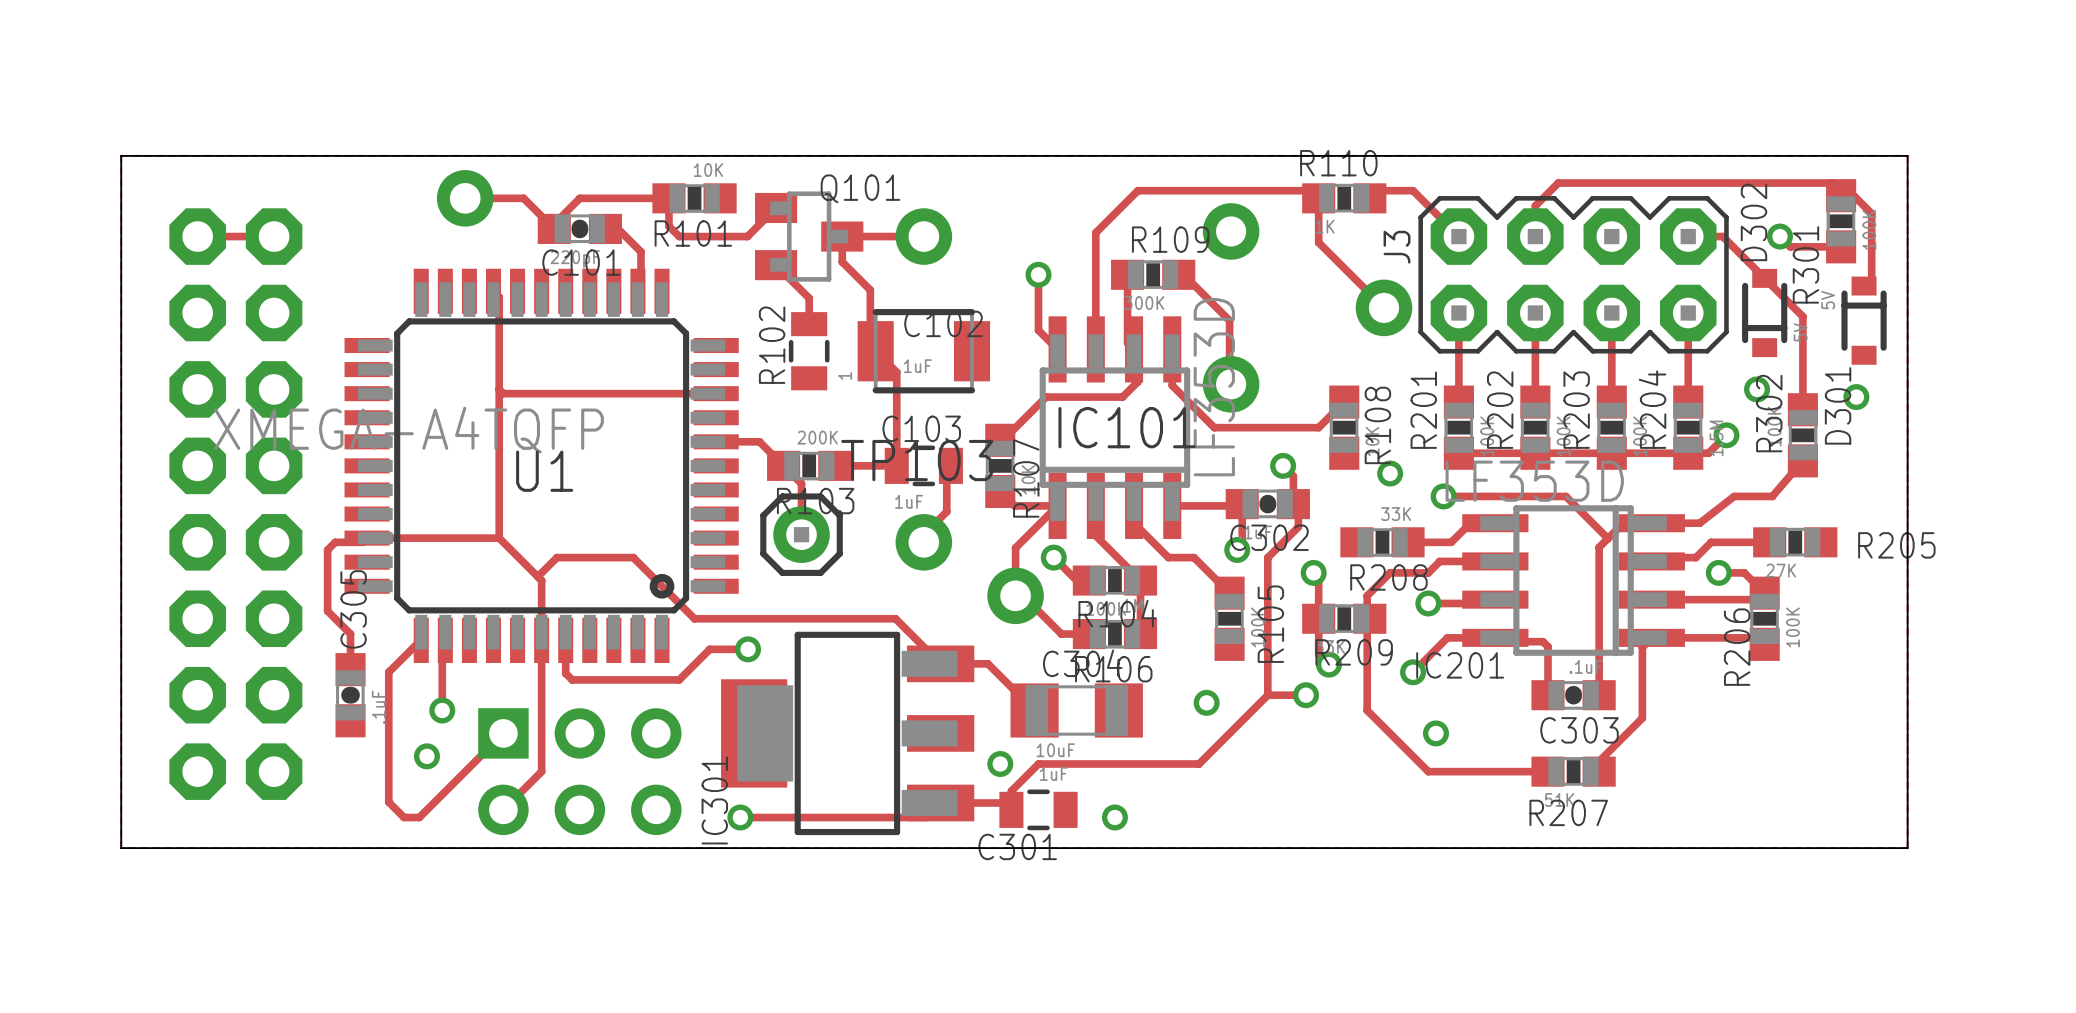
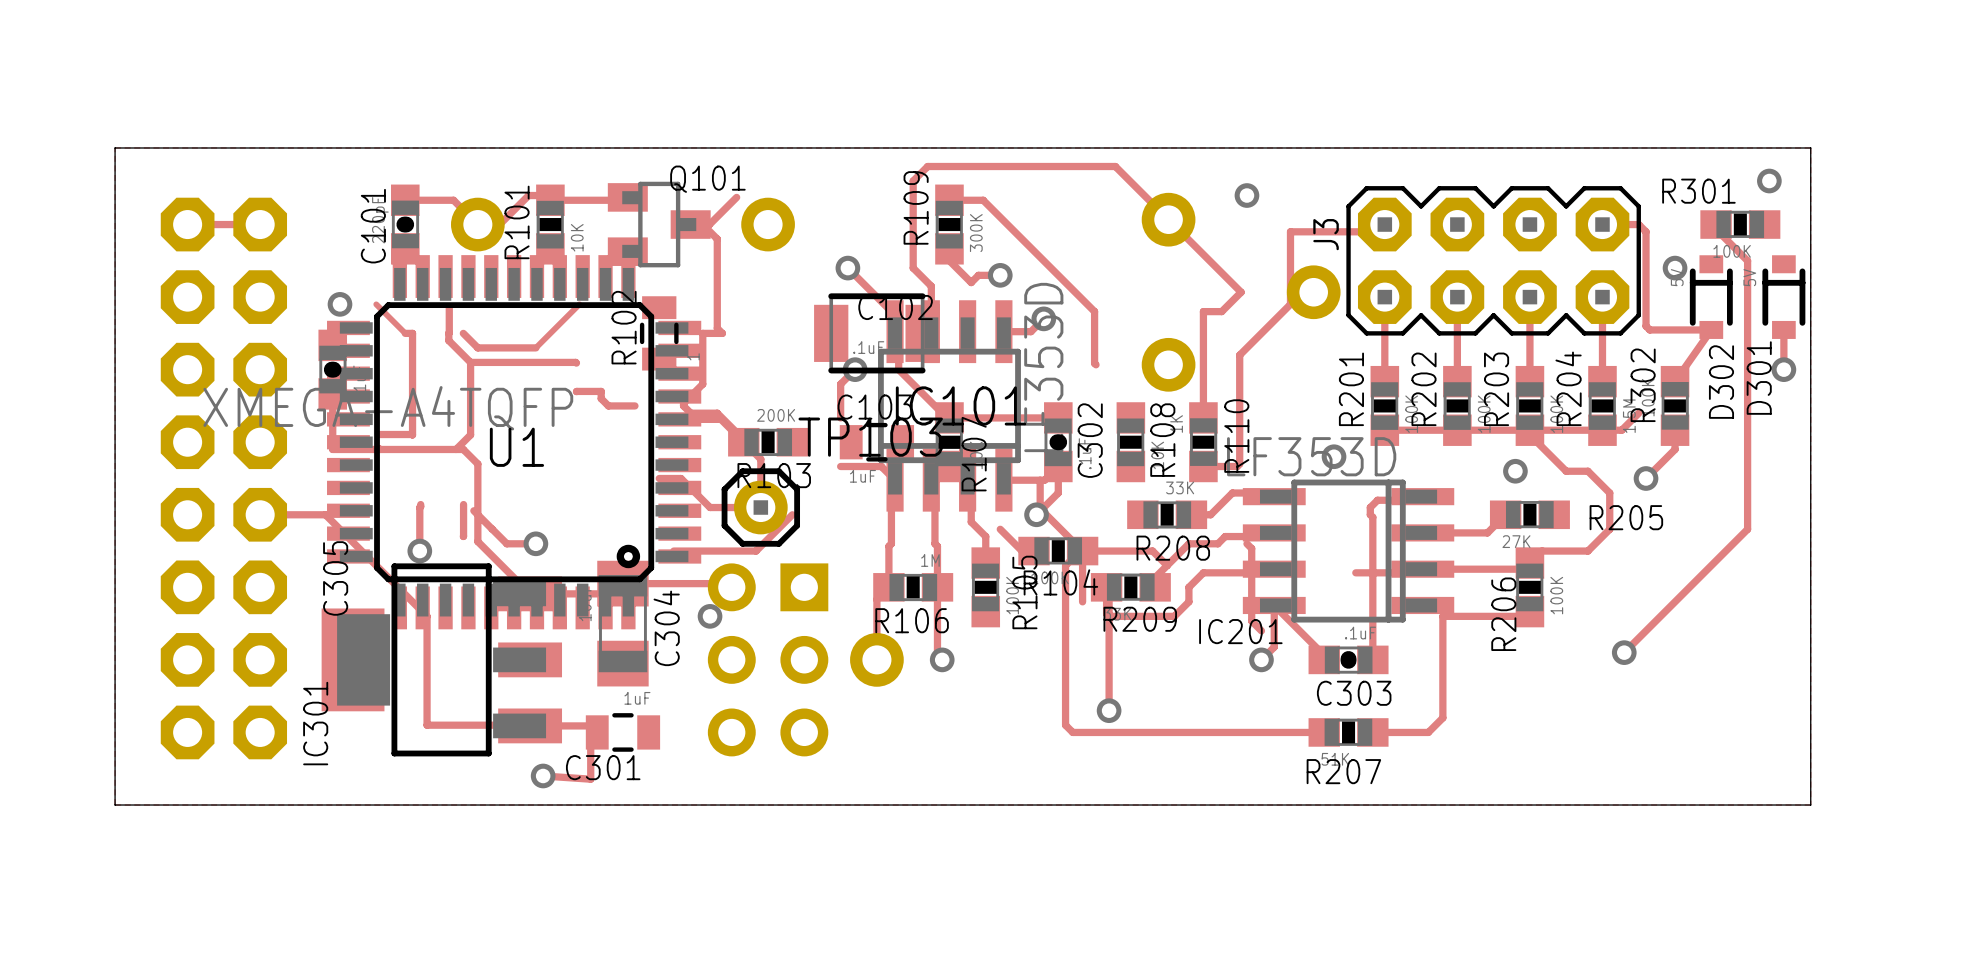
via: none -> (1769, 181)
track: (465, 198) (523, 198) (554, 228) (554, 223) (579, 198) (668, 198) (668, 226) (679, 236) (727, 236) -> none
part position: (465, 198) -> (477, 224)
R101 rotation: 0° (694, 198) -> 90° clockwise (550, 224)
R101 position: (694, 198) -> (550, 224)
R110 rotation: 0° (1344, 198) -> 90° clockwise (1203, 442)
R110 position: (1344, 198) -> (1203, 442)
track: (1369, 198) (1377, 190) (1413, 190) (1458, 236) -> (1203, 466) (1237, 466) (1239, 463) (1239, 355) (1290, 304) (1290, 231) (1377, 231) (1384, 224)
via: none -> (1246, 195)
track: none -> (627, 197) (624, 200) (550, 200) (545, 195) (528, 195) (499, 224) (477, 224) (453, 200) (405, 200)
track: none -> (949, 200) (983, 200) (1094, 311) (1096, 364)
R301 rotation: 0° (1841, 221) -> 90° clockwise (1740, 224)
C101 rotation: 0° (579, 228) -> 90° clockwise (405, 224)
C101 position: (579, 228) -> (405, 224)
track: (605, 228) (618, 228) (641, 251) (641, 288) (637, 291) -> none
track: none -> (702, 224) (717, 239) (717, 328) (722, 333) (702, 333) (702, 384) (683, 403) (683, 405) (690, 413) (717, 413) (742, 438) (742, 442)
Q101 position: (809, 236) -> (659, 224)
track: (923, 236) (842, 236) (842, 262) (870, 290) (870, 345) (896, 372) (896, 465) (834, 465) -> none
part position: (923, 236) -> (768, 224)
track: (1535, 236) (1535, 205) (1558, 183) (1833, 183) (1841, 195) (1853, 195) (1871, 213) (1871, 278) (1864, 286) -> none
track: (1722, 236) (1802, 316) (1802, 409) -> (1635, 224) (1638, 224) (1646, 231) (1646, 326) (1649, 329) (1711, 329) (1675, 381)
track: (1779, 236) (1790, 246) (1841, 246) -> none
via: (1779, 236) -> none
track: none -> (1716, 224) (1716, 229) (1747, 260) (1747, 529) (1624, 652)
track: none -> (949, 248) (949, 260) (971, 282) (978, 275) (1000, 275)
track: (776, 265) (809, 298) (809, 324) -> none
track: (1038, 274) (1038, 330) (1057, 349) -> (1043, 318) (1031, 331) (1003, 331)
via position: (1038, 274) -> (1000, 275)
track: (1127, 274) (1127, 342) (1137, 353) (1137, 381) (1122, 397) (1046, 397) (1002, 440) -> (1058, 417) (951, 417)
R109 rotation: 0° (1153, 274) -> 90° clockwise (949, 224)
R109 position: (1153, 274) -> (949, 224)
track: (1178, 274) (1183, 274) (1229, 320) (1231, 384) -> none
track: none -> (847, 268) (891, 311) (891, 333) (895, 331) (898, 335) (898, 369) (946, 417) (949, 417)
via: none -> (847, 268)
via: none -> (1675, 268)
track: (493, 291) (499, 297) (499, 538) (367, 538) (362, 542) (342, 542) -> (590, 725) (427, 725) (427, 616) (325, 514)
track: (1383, 307) (1318, 242) (1318, 198) (1311, 190) (1137, 190) (1095, 232) (1095, 349) -> none
D302 rotation: 0° (1764, 313) -> 180° (1711, 297)
via: none -> (339, 304)
track: none -> (376, 304) (405, 333) (412, 333) (412, 434) (379, 434)
track: none -> (579, 304) (535, 347) (477, 347) (463, 333)
D301 position: (1864, 320) -> (1783, 297)
track: none -> (449, 307) (448, 340) (470, 362)
via: none -> (1043, 318)
track: none -> (931, 331) (931, 286) (913, 268) (913, 181) (927, 166) (1115, 166) (1241, 292) (1221, 311) (1203, 311) (1203, 417)
track: (1172, 349) (1172, 385) (1214, 427) (1318, 427) (1344, 402) -> none
R102 position: (809, 351) -> (659, 333)
track: none -> (1783, 333) (1783, 369)
track: none -> (470, 362) (576, 363)
track: none -> (470, 362) (470, 434) (456, 449)
track: (499, 389) (503, 393) (716, 393) -> none
track: none -> (855, 369) (840, 384) (840, 417)
via: none -> (855, 369)
via: (1757, 389) -> none
via position: (1856, 397) -> (1783, 369)
track: none -> (576, 391) (601, 391) (601, 398) (608, 405) (634, 405)
track: none -> (332, 393) (332, 449) (463, 449) (477, 463) (477, 541) (530, 593) (612, 593) (622, 583) (728, 583) (731, 587)
IC101 position: (1114, 427) -> (949, 405)
R108 position: (1344, 427) -> (1130, 442)
via: (1726, 435) -> none
R302 position: (1802, 435) -> (1675, 405)
track: none -> (1529, 430) (1529, 434) (1566, 471) (1587, 471) (1609, 493) (1609, 529) (1587, 551) (1541, 551) (1523, 569) (1422, 569)
track: none -> (1675, 430) (1675, 449) (1646, 478)
track: (1802, 460) (1772, 496) (1734, 496) (1699, 523) (1651, 523) (1648, 527) (1619, 527) (1599, 547) (1599, 695) -> none
track: (950, 465) (946, 470) (946, 511) (923, 534) (923, 542) -> none
track: (1283, 465) (1293, 476) (1293, 504) (1298, 509) (1298, 527) (1267, 557) (1267, 695) -> none
via: (1283, 465) -> none
via position: (1390, 473) -> (1334, 456)
track: none -> (840, 466) (881, 466) (895, 480) (891, 483) (888, 587) (876, 599) (876, 659)
track: (1000, 491) (1014, 505) (1057, 505) (1015, 547) (1015, 595) (1023, 595) (1061, 634) (1089, 634) -> none
track: (1443, 496) (1565, 496) (1607, 538) -> none
via: (1443, 496) -> none
via: none -> (1515, 471)
track: none -> (659, 478) (681, 478) (710, 507) (736, 507) (743, 514)
C302 rotation: 0° (1267, 504) -> 90° clockwise (1058, 442)
C302 position: (1267, 504) -> (1058, 442)
via: none -> (1646, 478)
track: none -> (931, 480) (934, 483) (934, 543) (937, 546) (937, 655) (942, 659)
track: none -> (967, 480) (971, 483) (971, 522) (985, 536) (985, 563)
track: none -> (1003, 480) (1044, 480) (1058, 466) (1058, 493) (1036, 514)
track: (1134, 505) (1134, 523) (1168, 557) (1194, 557) (1229, 593) -> none
track: (1172, 505) (1240, 505) (1242, 504) (1242, 544) (1237, 549) -> none
track: none -> (1274, 496) (1270, 493) (1232, 493) (1210, 514) (1191, 514)
track: (1466, 527) (1451, 542) (1408, 542) -> (1392, 500) (1377, 500) (1370, 507) (1370, 514) (1372, 517) (1372, 659)
track: none -> (420, 504) (419, 551)
track: none -> (463, 504) (463, 536)
track: (335, 542) (327, 549) (327, 611) (350, 634) (350, 669) -> (318, 514) (260, 514)
track: none -> (792, 514) (756, 551) (673, 551)
part: (923, 542) -> none
R208 position: (1382, 542) -> (1167, 514)
track: none -> (1505, 514) (1487, 532) (1422, 532)
track: (1769, 542) (1711, 542) (1695, 557) (1655, 557) (1651, 561) -> none
R205 position: (1795, 542) -> (1529, 514)
via: (1237, 549) -> none
via position: (1053, 557) -> (1036, 514)
track: none -> (1274, 532) (1270, 536) (1225, 536) (1217, 543) (1188, 543) (1155, 577) (1155, 587)
track: (1495, 561) (1439, 561) (1428, 572) (1390, 572) (1367, 595) (1367, 616) (1369, 618) (1367, 621) (1367, 710) (1428, 771) (1446, 771) -> none
track: (533, 572) (541, 580) (541, 771) (503, 809) -> (506, 543) (535, 543)
via: none -> (535, 543)
via: (1313, 572) -> none
track: (1718, 572) (1744, 572) (1764, 593) (1758, 599) (1651, 599) -> none
via: (1718, 572) -> none
track: (537, 576) (556, 557) (633, 557) (694, 618) (895, 618) (940, 663) (987, 663) (1034, 710) -> none
via: none -> (419, 551)
IC201 position: (1573, 580) -> (1348, 551)
part: (1015, 595) -> none
track: none -> (1167, 565) (1152, 551) (1080, 551) (1065, 565) (1065, 725) (1072, 732) (1324, 732)
track: none -> (1274, 569) (1270, 572) (1203, 572) (1188, 587) (1188, 601) (1174, 616) (1109, 616) (1106, 613) (1106, 587) (1109, 589) (1109, 710)
via: (1428, 603) -> none
R105 position: (1229, 618) -> (985, 587)
R209 position: (1344, 618) -> (1130, 587)
R206 position: (1764, 618) -> (1529, 587)
R106 position: (1114, 634) -> (913, 587)
track: (421, 640) (388, 672) (388, 802) (404, 817) (419, 817) (503, 733) -> none
track: (445, 640) (442, 643) (442, 710) -> none
track: (565, 640) (565, 673) (572, 679) (679, 679) (709, 649) (748, 649) -> none
track: (1764, 644) (1758, 637) (1651, 637) (1642, 647) (1642, 718) (1599, 761) (1599, 771) -> none
via: (1328, 664) -> none
track: (1413, 672) (1447, 637) (1495, 637) (1499, 641) (1543, 641) (1548, 646) (1548, 695) -> none
via: (1413, 672) -> none
via: none -> (1624, 652)
C305 position: (350, 695) -> (332, 369)
part: none -> (876, 659)
track: (1267, 695) (1199, 764) (1038, 764) (1011, 791) (1011, 809) (1004, 802) (940, 802) (926, 817) (740, 817) -> none
track: (1267, 695) (1306, 695) -> none
via position: (1306, 695) -> (1261, 659)
track: none -> (1261, 659) (1274, 647) (1274, 605) (1324, 655) (1324, 659)
C303 position: (1573, 695) -> (1348, 659)
via: (1206, 702) -> none
via: (442, 710) -> none
C304 rotation: 0° (1076, 710) -> 90° clockwise (622, 623)
C304 position: (1076, 710) -> (622, 623)
IC301 position: (847, 733) -> (441, 659)
via: (1435, 733) -> none
via: none -> (1109, 710)
via: (426, 756) -> none
track: none -> (590, 725) (590, 779) (543, 775)
via position: (1000, 764) -> (942, 659)
part rotation: 0° (579, 771) -> 90° clockwise (768, 659)
part position: (579, 771) -> (768, 659)
track: (1504, 771) (1548, 771) -> (1428, 732) (1442, 717) (1442, 616) (1525, 616) (1529, 611)
R207 position: (1573, 771) -> (1348, 732)
C301 position: (1038, 809) -> (622, 732)
via: none -> (543, 775)
via: (740, 817) -> none
via: (1114, 817) -> none

